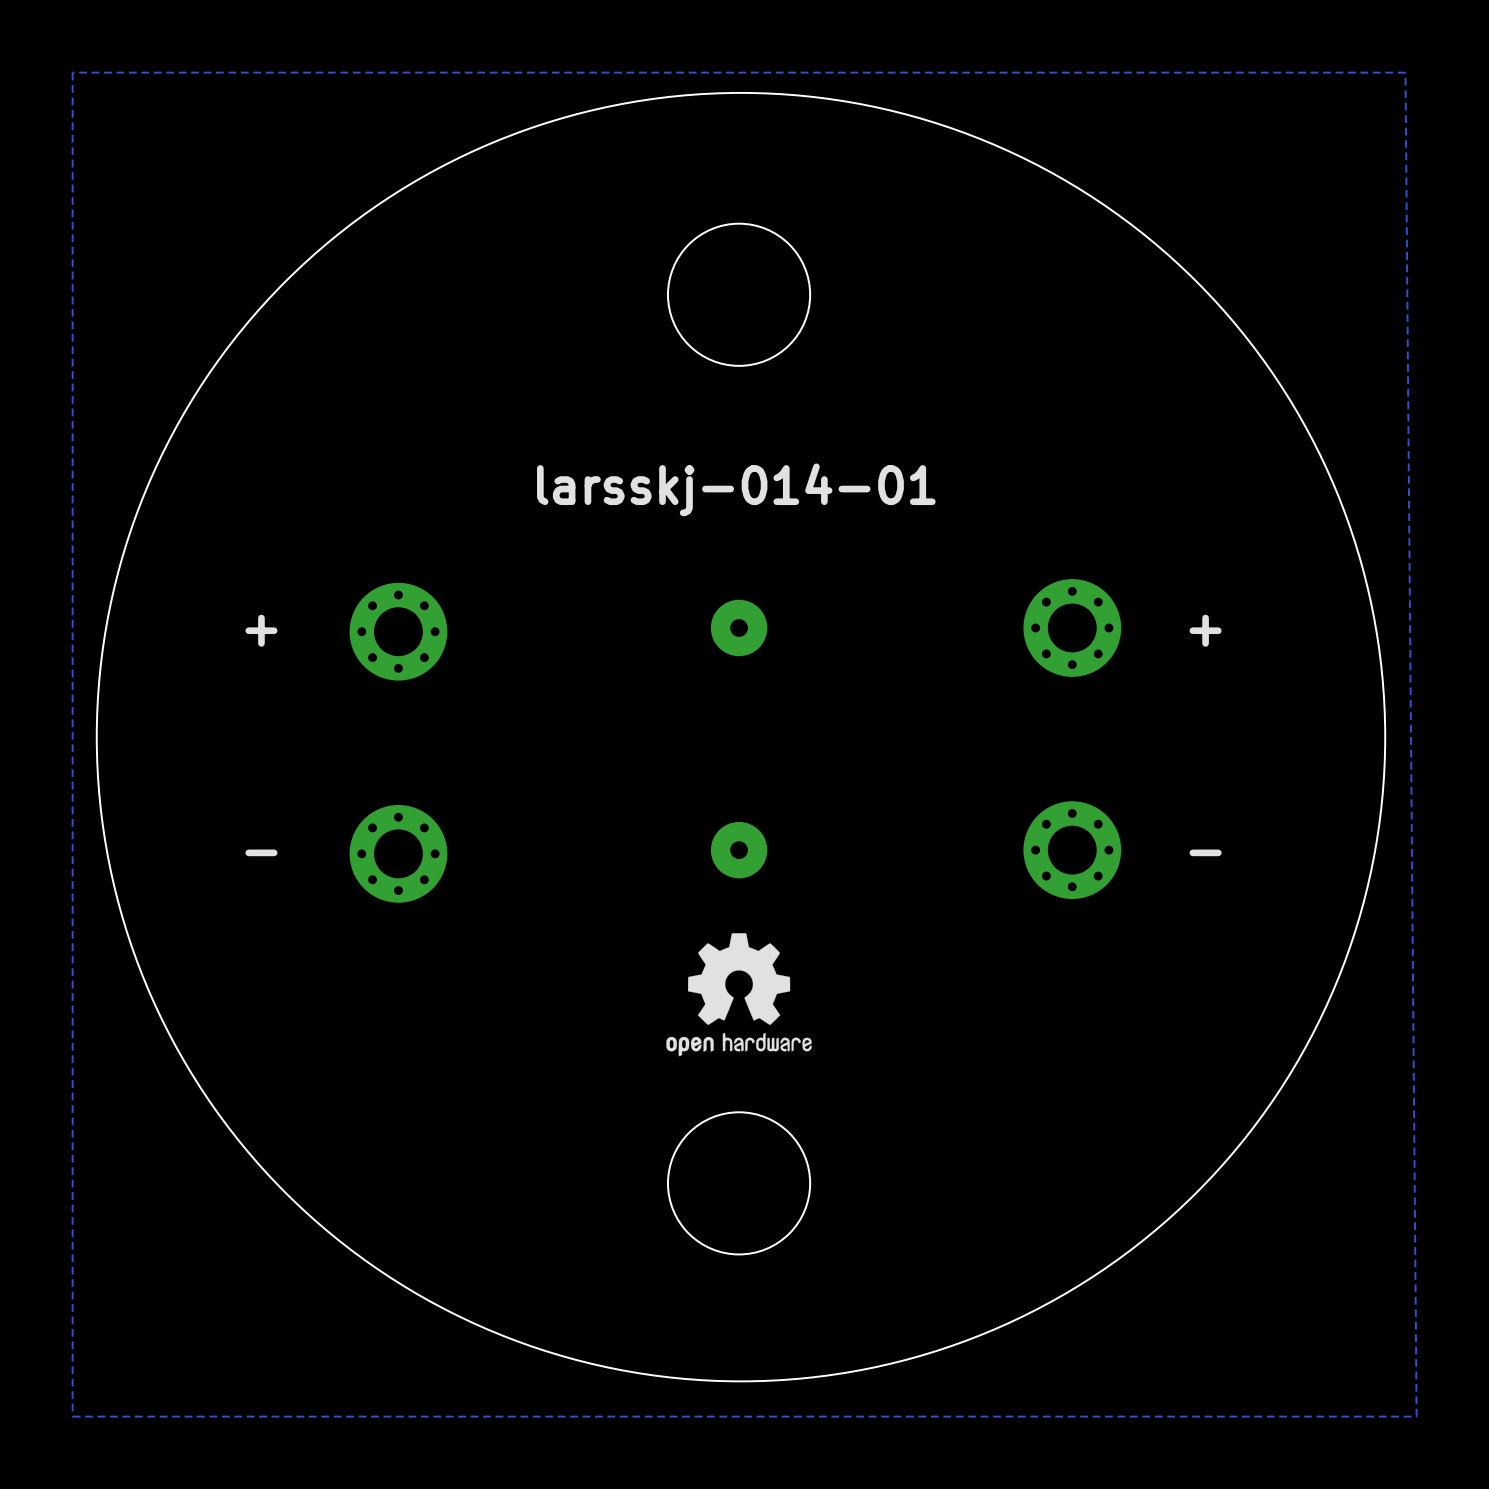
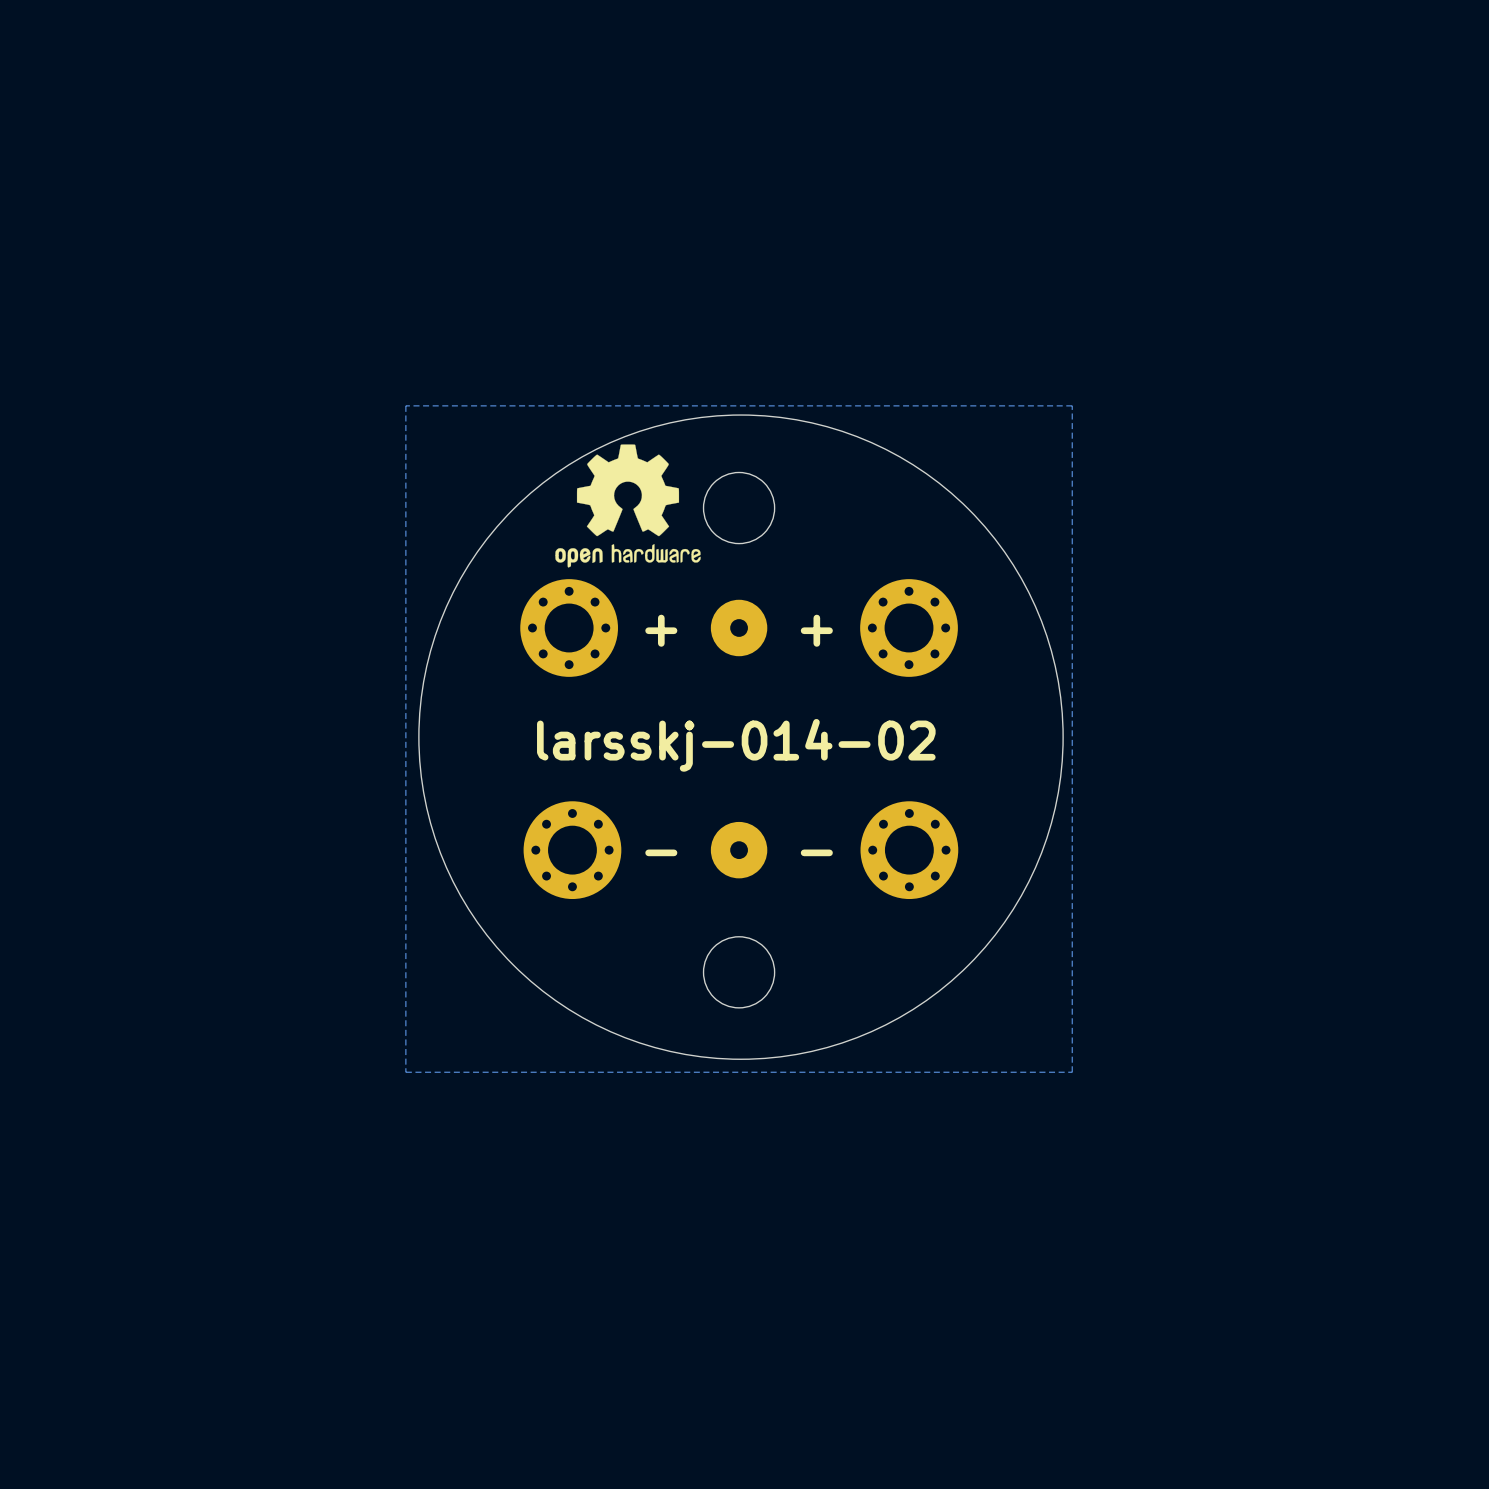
zone outline: (1405, 72) (72, 72) (72, 1416) (1416, 1416) (1405, 72) -> none
round board edge size: [96, 92, 1386, 1382] -> [418, 414, 1064, 1060]
round board edge: [667, 223, 811, 367] -> none
zone outline: none -> (1072, 405) (405, 405) (405, 1072) (1072, 1072) (1072, 405)
round board edge: none -> [702, 471, 776, 545]
text: larsskj-014-01 (736, 489) -> none
part: none -> (569, 627)
part: none -> (909, 627)
part: (1072, 627) -> none
text: + (261, 630) -> none
text: none -> + (661, 630)
text: none -> + (816, 630)
text: + (1205, 630) -> none
part: (398, 631) -> none
text: none -> larsskj-014-02 (736, 745)
part: none -> (572, 850)
part: none -> (909, 850)
part: (1072, 850) -> none
text: - (261, 852) -> none
text: none -> - (661, 852)
text: none -> - (816, 852)
text: - (1205, 852) -> none
part: (398, 853) -> none
round board edge: none -> [702, 936, 776, 1009]
drawing position: (739, 994) -> (627, 505)
round board edge: [667, 1111, 811, 1256] -> none

